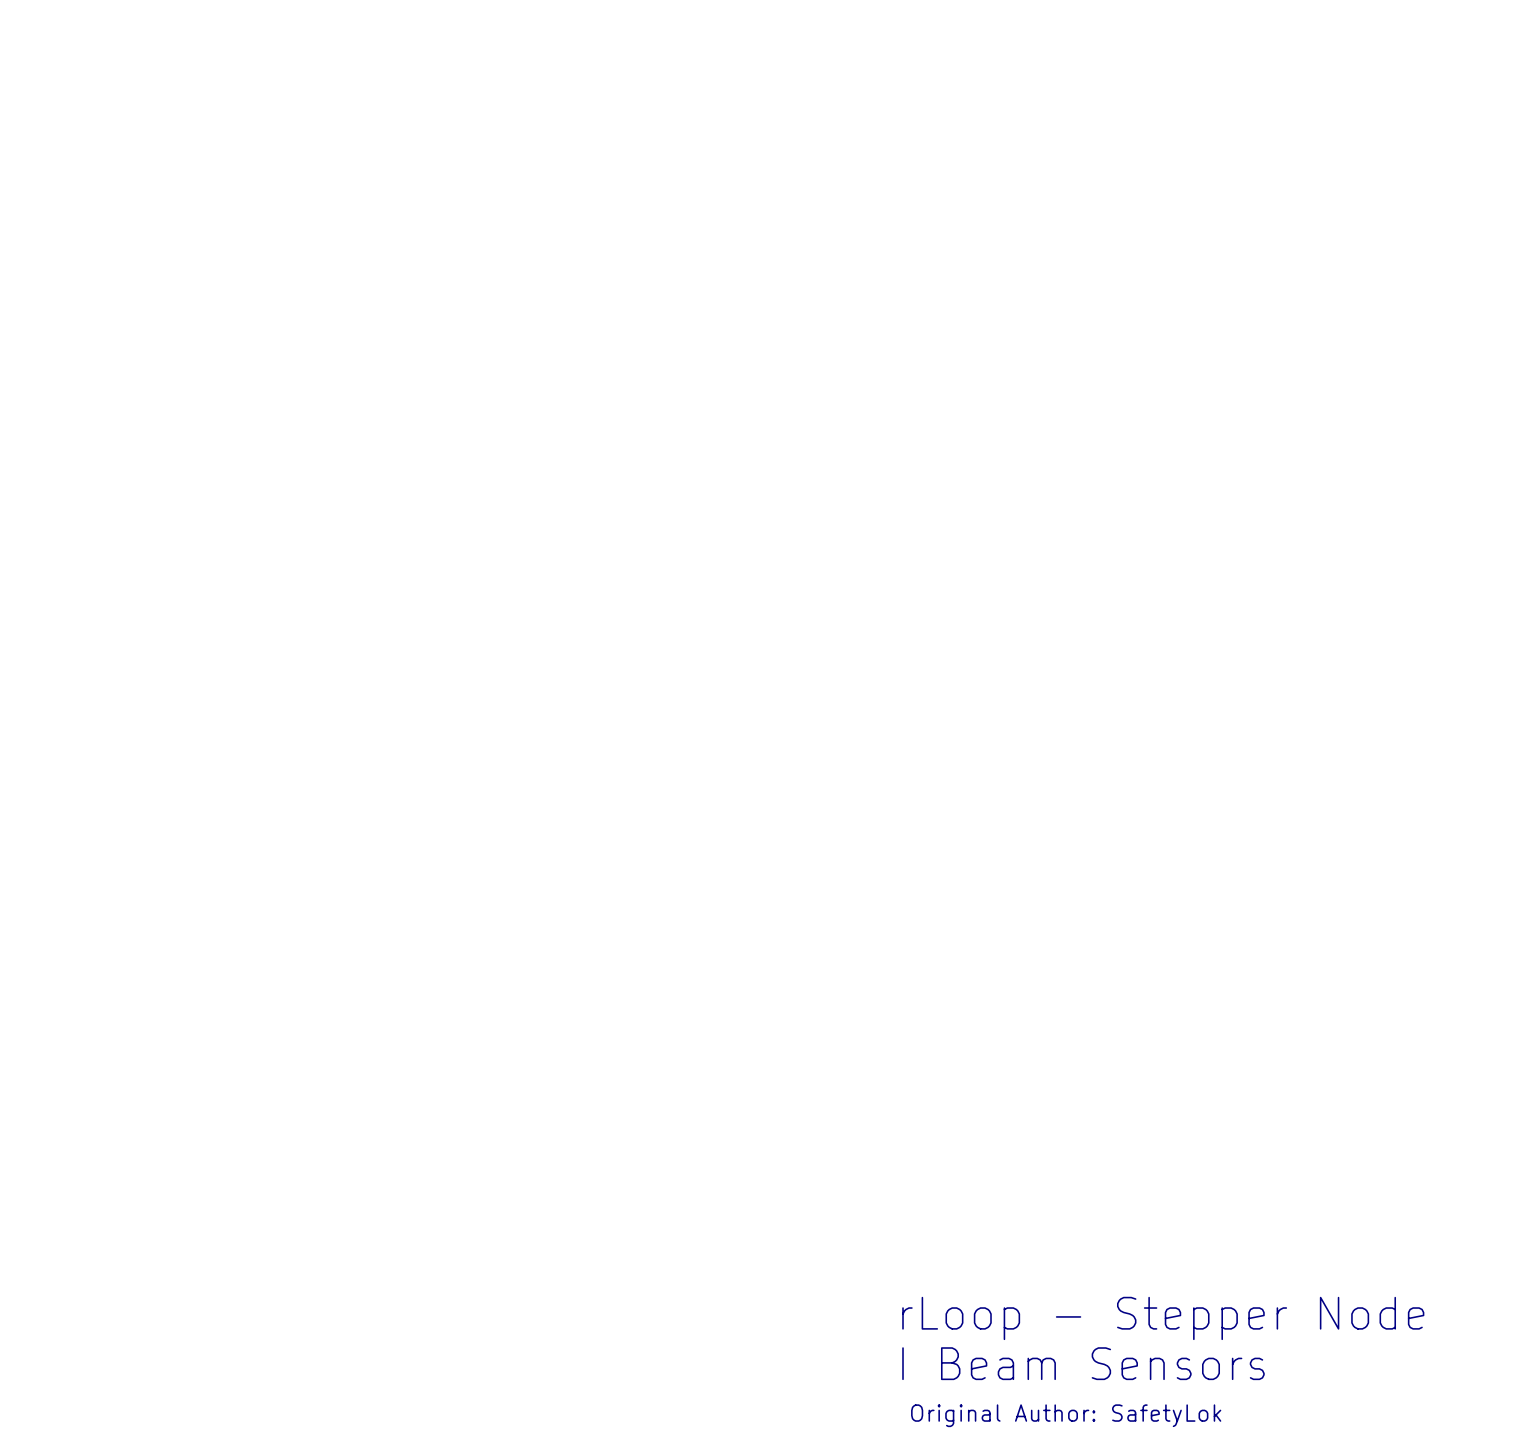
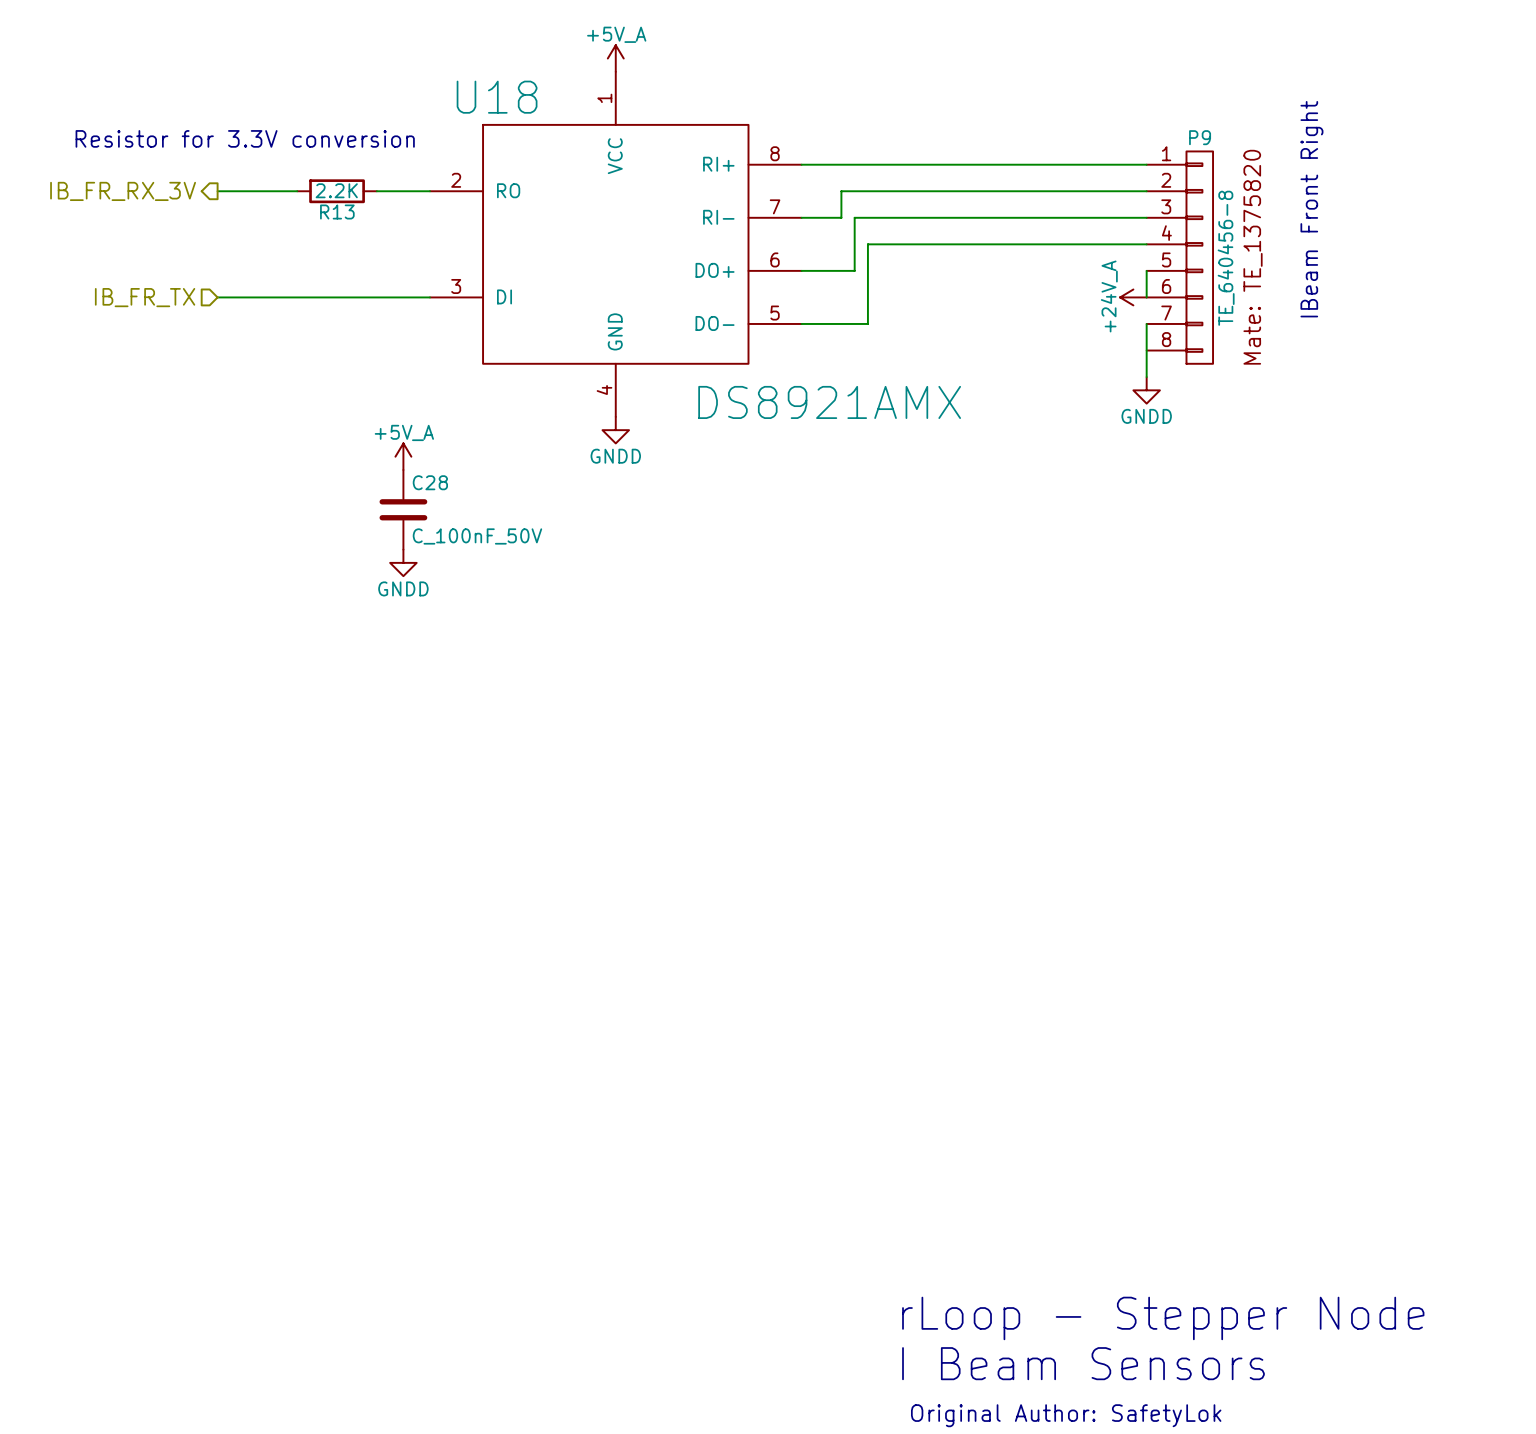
power symbol: none -> +5V_A (615, 58)
text: none -> Resistor for 3.3V conversion (245, 138)
wire: none -> (801, 164) (1146, 164)
hierarchical label: none -> IB_FR_RX_3V (123, 191)
wire: none -> (217, 191) (297, 191)
R13: none -> 2.2K (337, 191)
wire: none -> (376, 191) (429, 191)
wire: none -> (1146, 191) (841, 191) (841, 217) (801, 217)
text: none -> IBeam Front Right (1311, 209)
wire: none -> (1146, 217) (854, 217) (854, 270) (801, 270)
U18: none -> DS8921AMX (615, 244)
wire: none -> (1146, 244) (867, 244) (867, 323) (801, 323)
P9: none -> TE_640456-8 (1179, 257)
wire: none -> (1146, 270) (1146, 297)
hierarchical label: none -> IB_FR_TX (145, 297)
wire: none -> (217, 297) (429, 297)
power symbol: none -> +24V_A (1133, 297)
wire: none -> (1146, 323) (1146, 377)
power symbol: none -> GNDD (1146, 390)
power symbol: none -> GNDD (615, 430)
power symbol: none -> +5V_A (403, 456)
C28: none -> C_100nF_50V (403, 509)
power symbol: none -> GNDD (403, 562)

